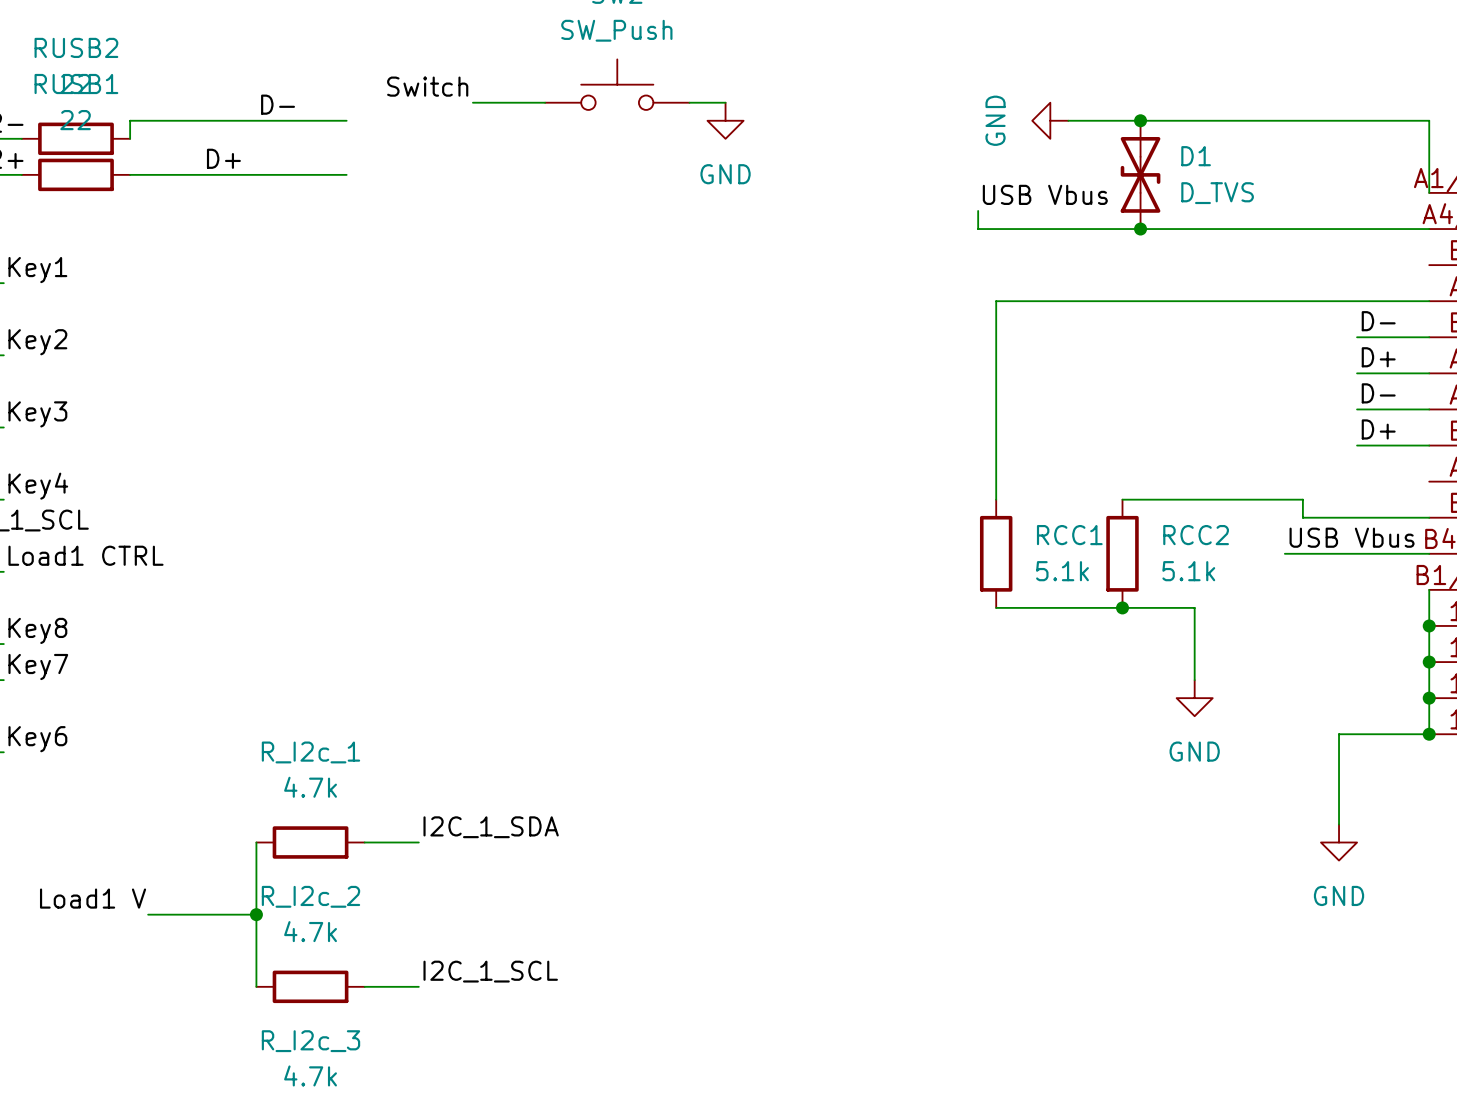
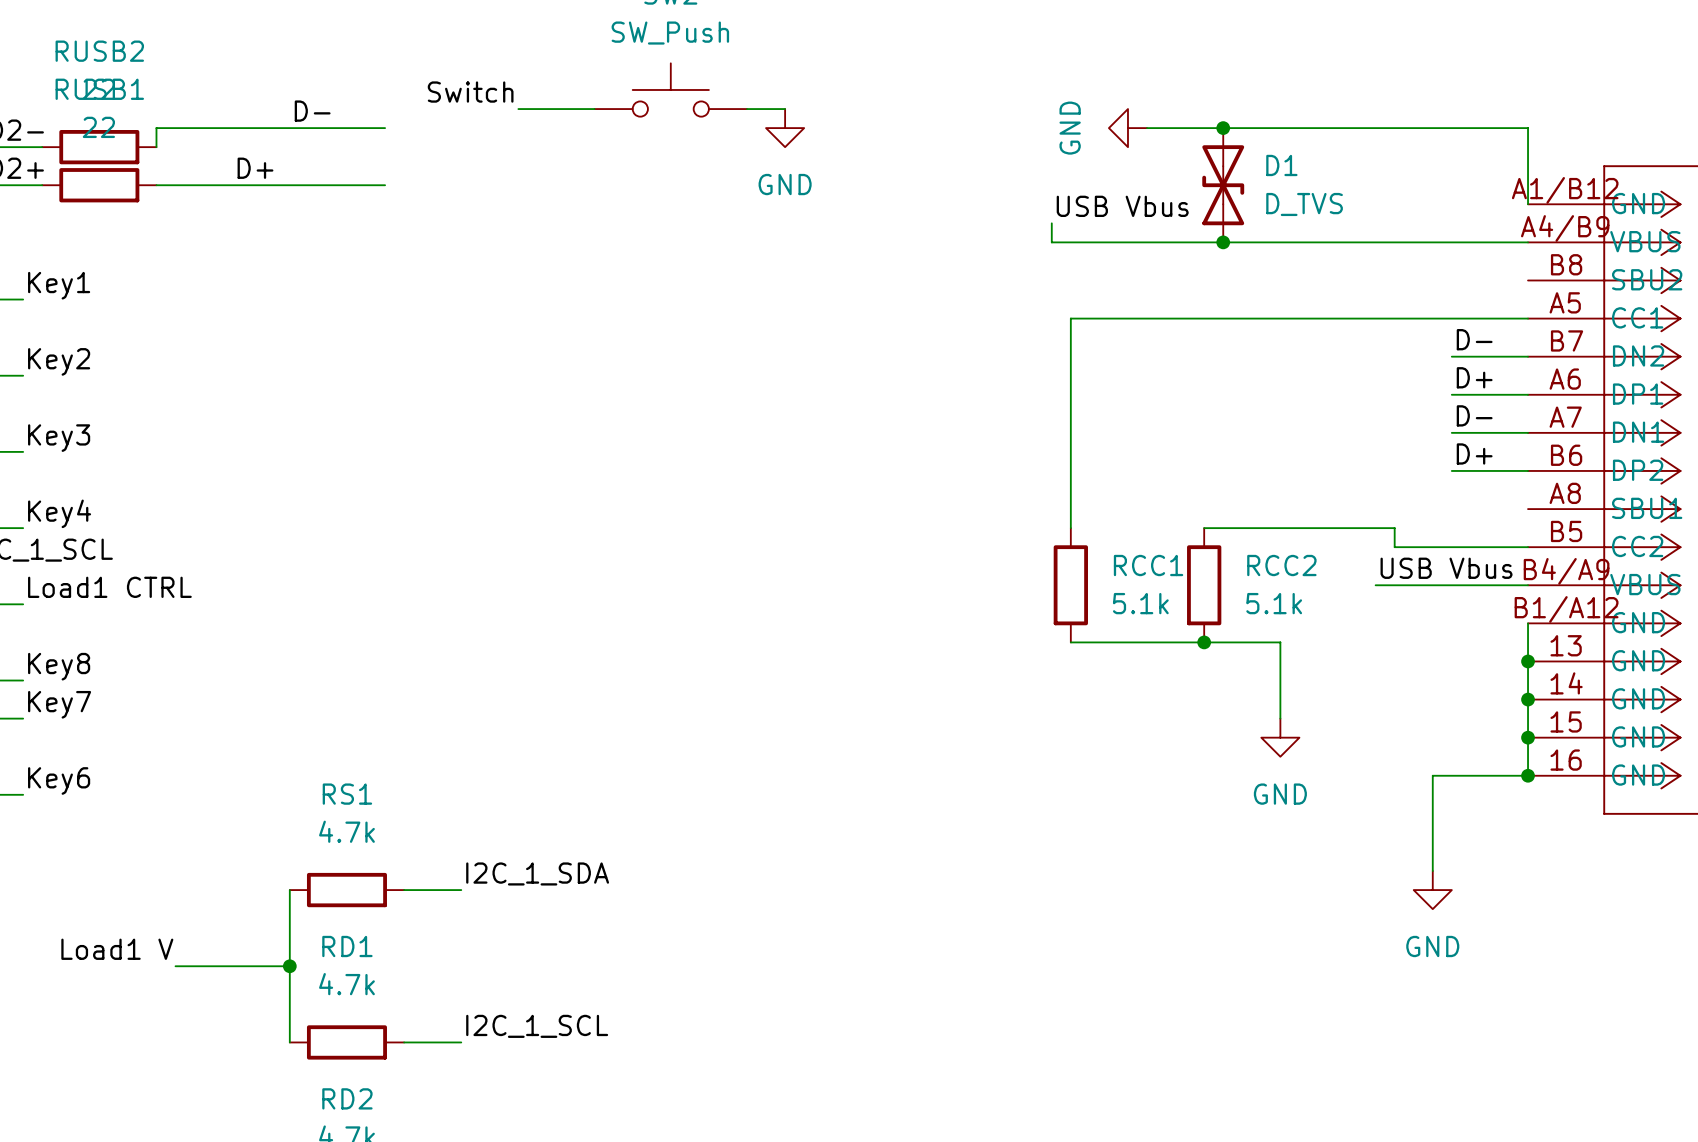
R_I2c_1 name: R_I2c_1 (310, 752) -> RS1 (347, 794)
R_I2c_2 name: R_I2c_2 (310, 896) -> RD1 (347, 946)
R_I2c_3 name: R_I2c_3 (310, 1041) -> RD2 (347, 1098)

